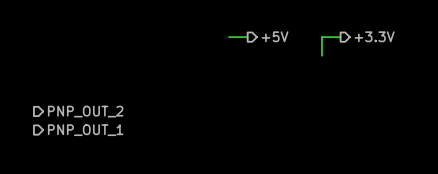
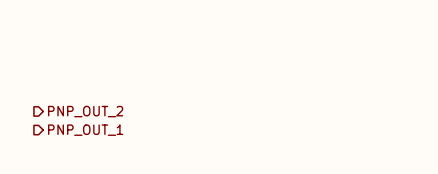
hierarchical label: +5V (275, 36) -> none
hierarchical label: +3.3V (374, 36) -> none
wire: (229, 37) (247, 37) -> none
wire: (340, 37) (321, 37) (321, 55) -> none

